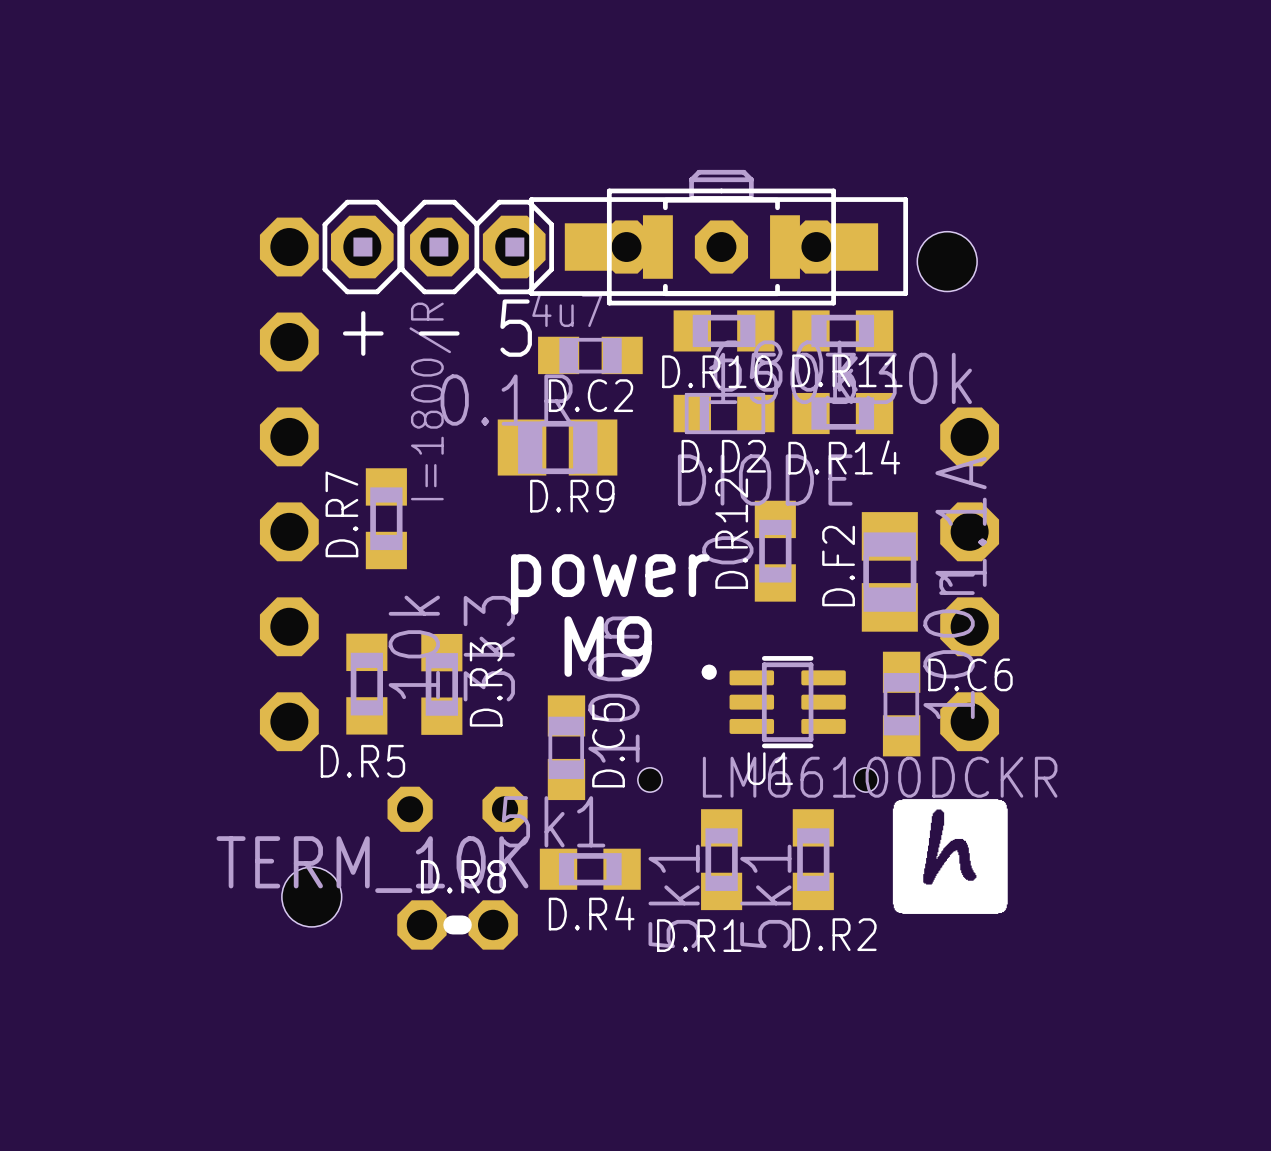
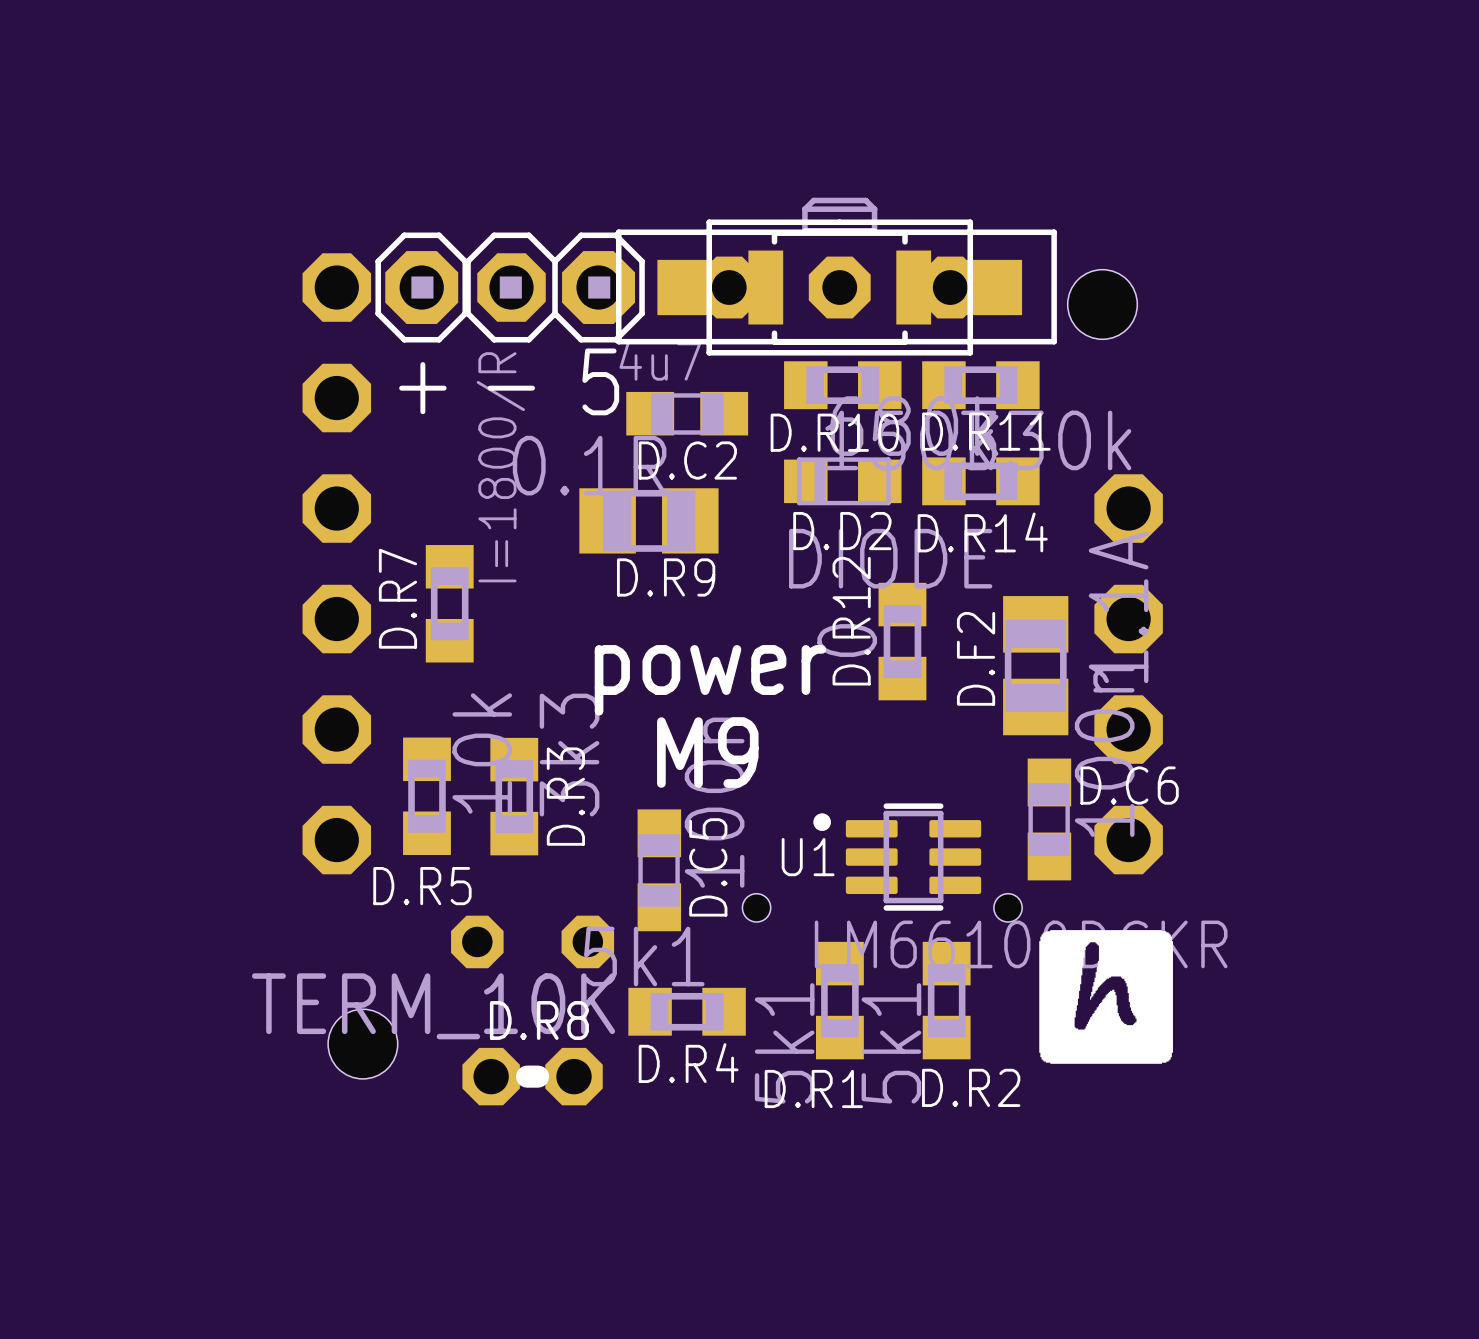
U1 position: (773, 702) -> (897, 857)
U1 name position: U1 (770, 768) -> U1 (808, 857)

